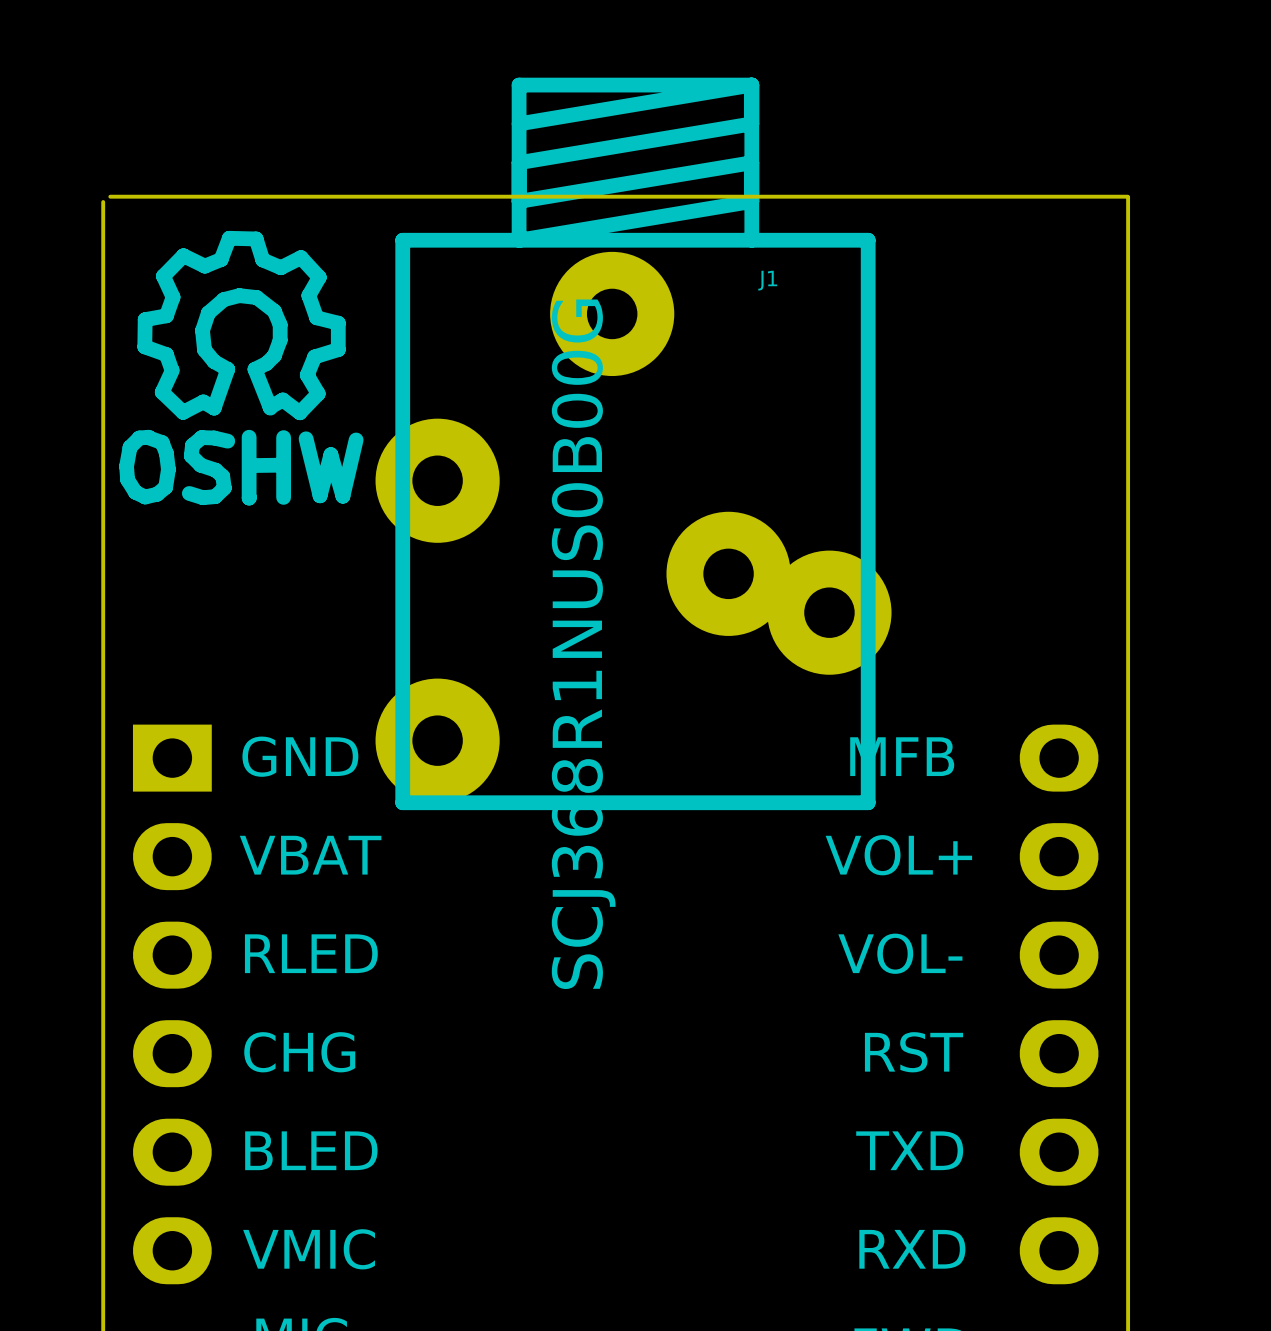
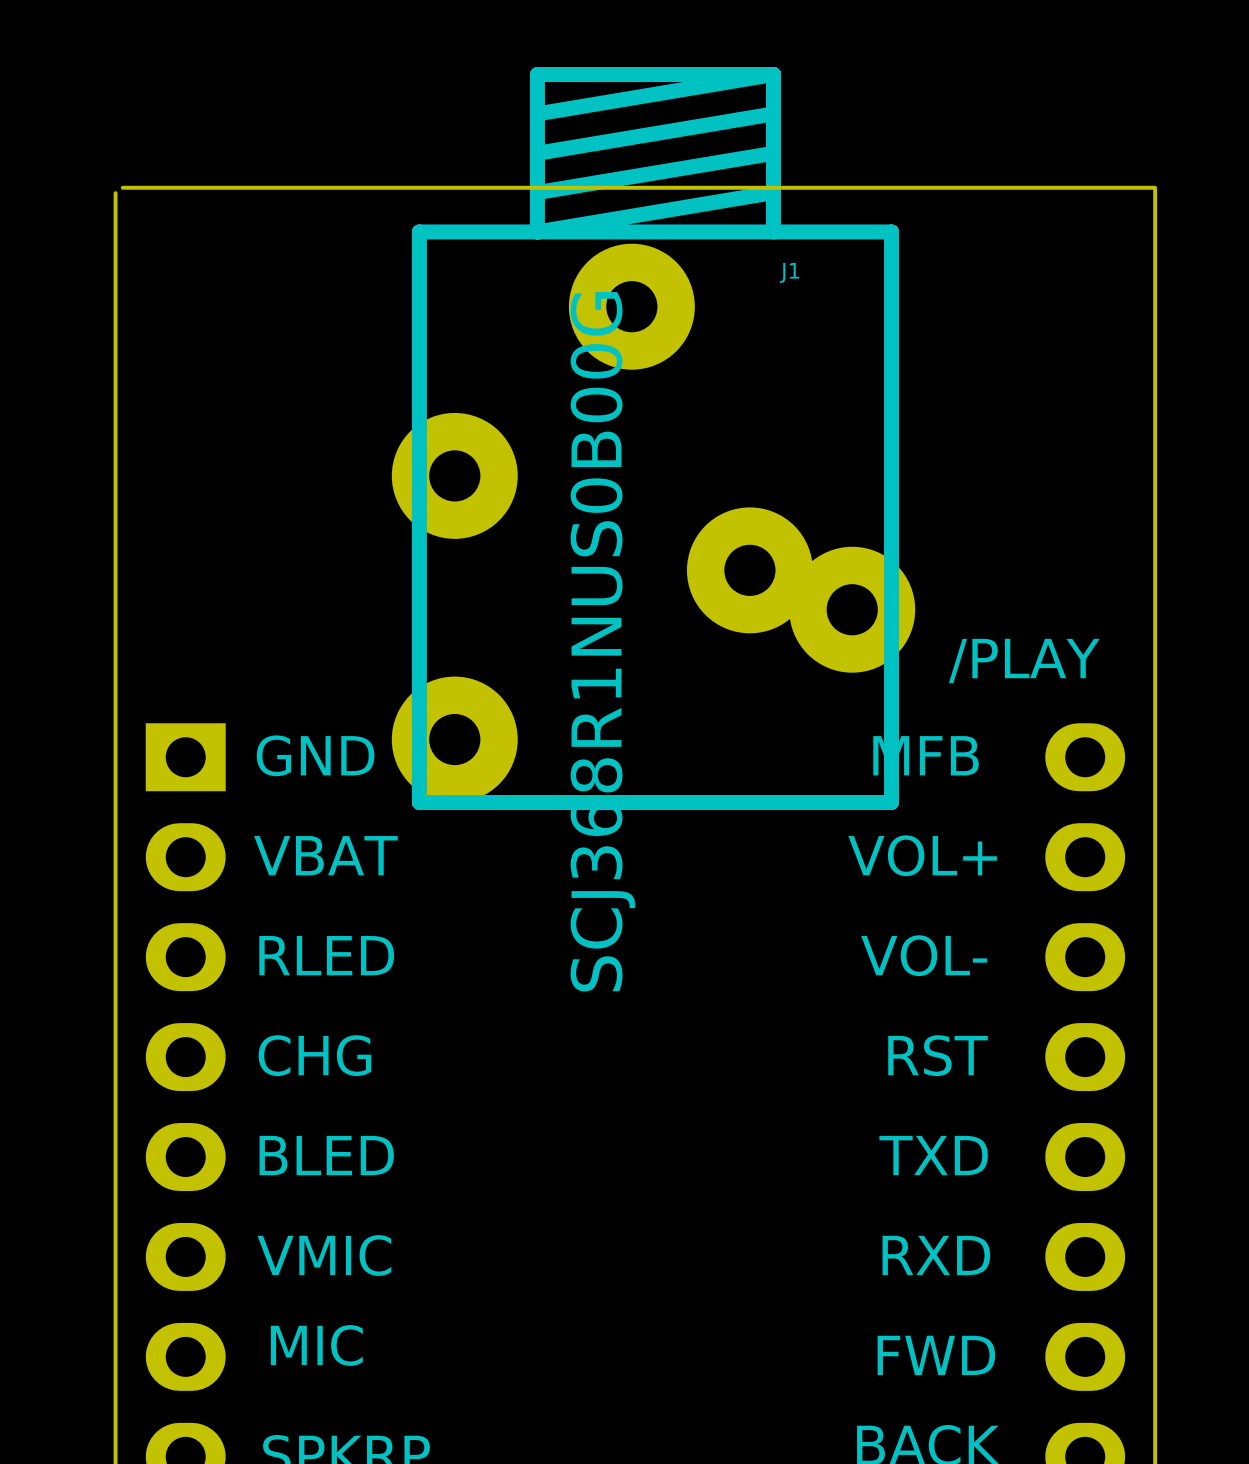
drawing: [119, 230, 364, 506] -> none
text: none -> /PLAY (1024, 661)

